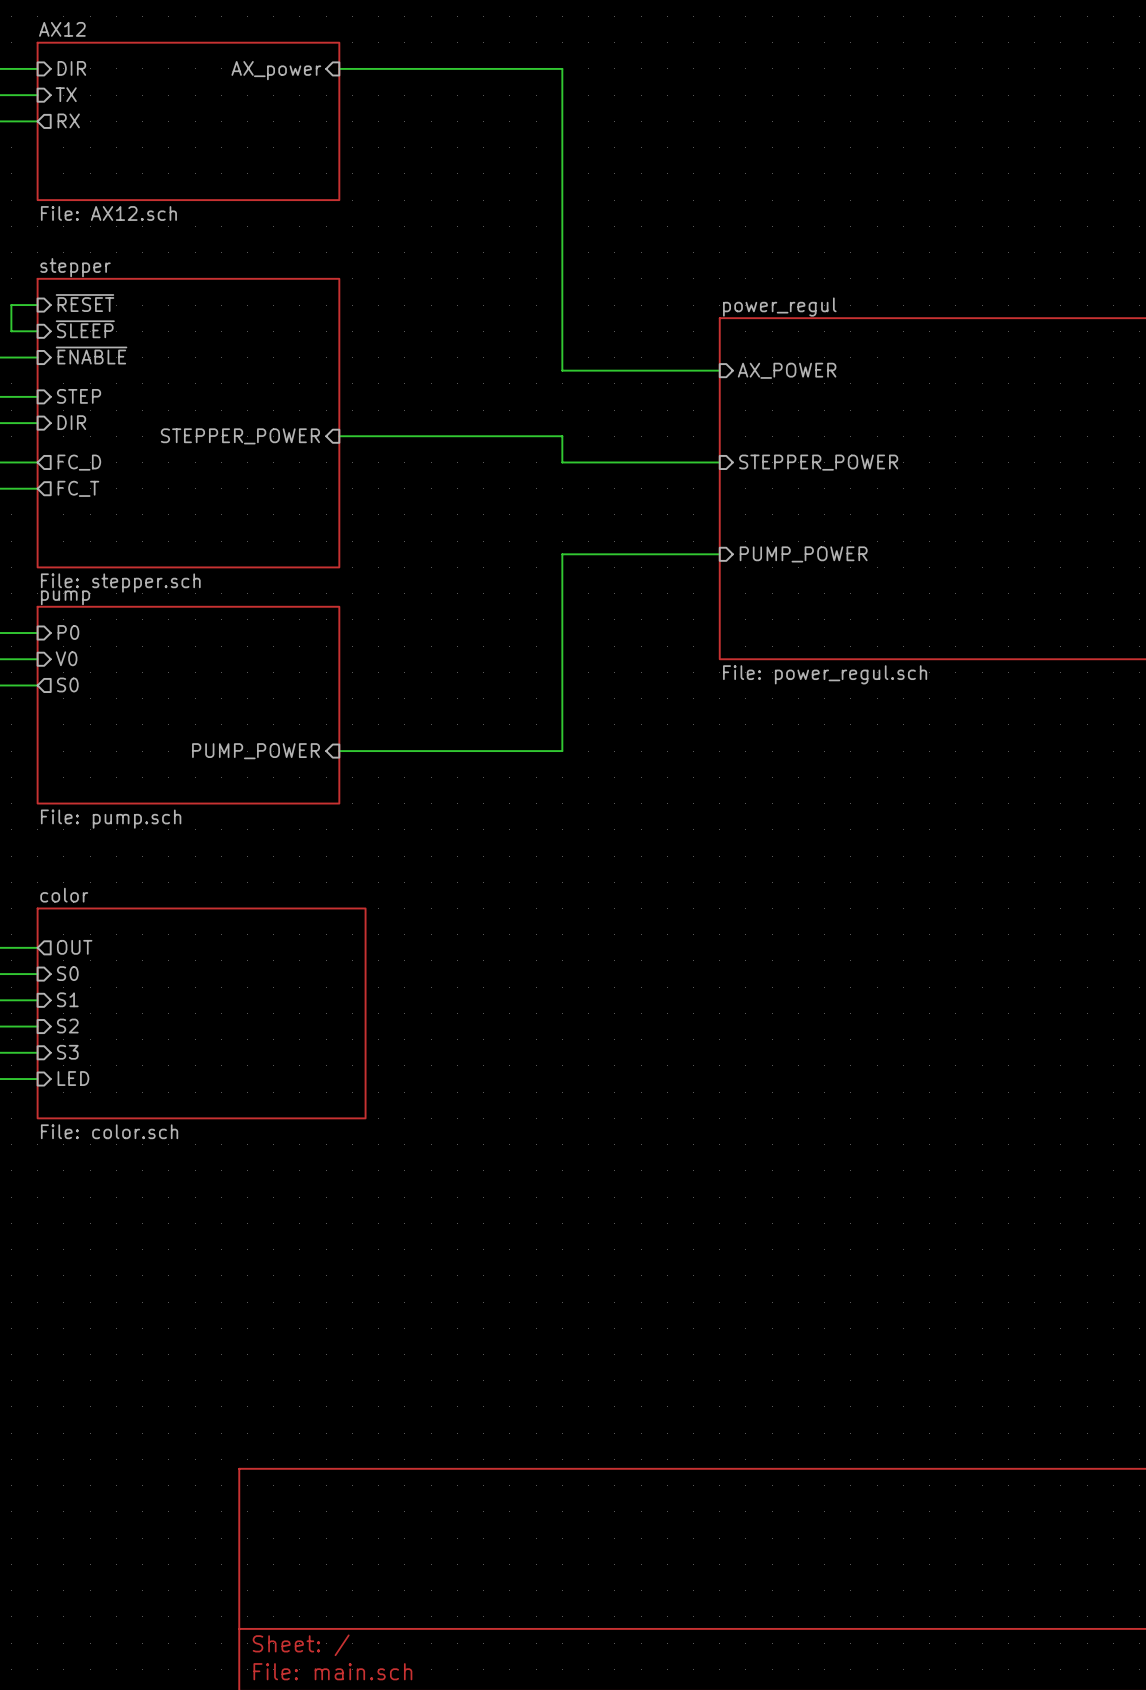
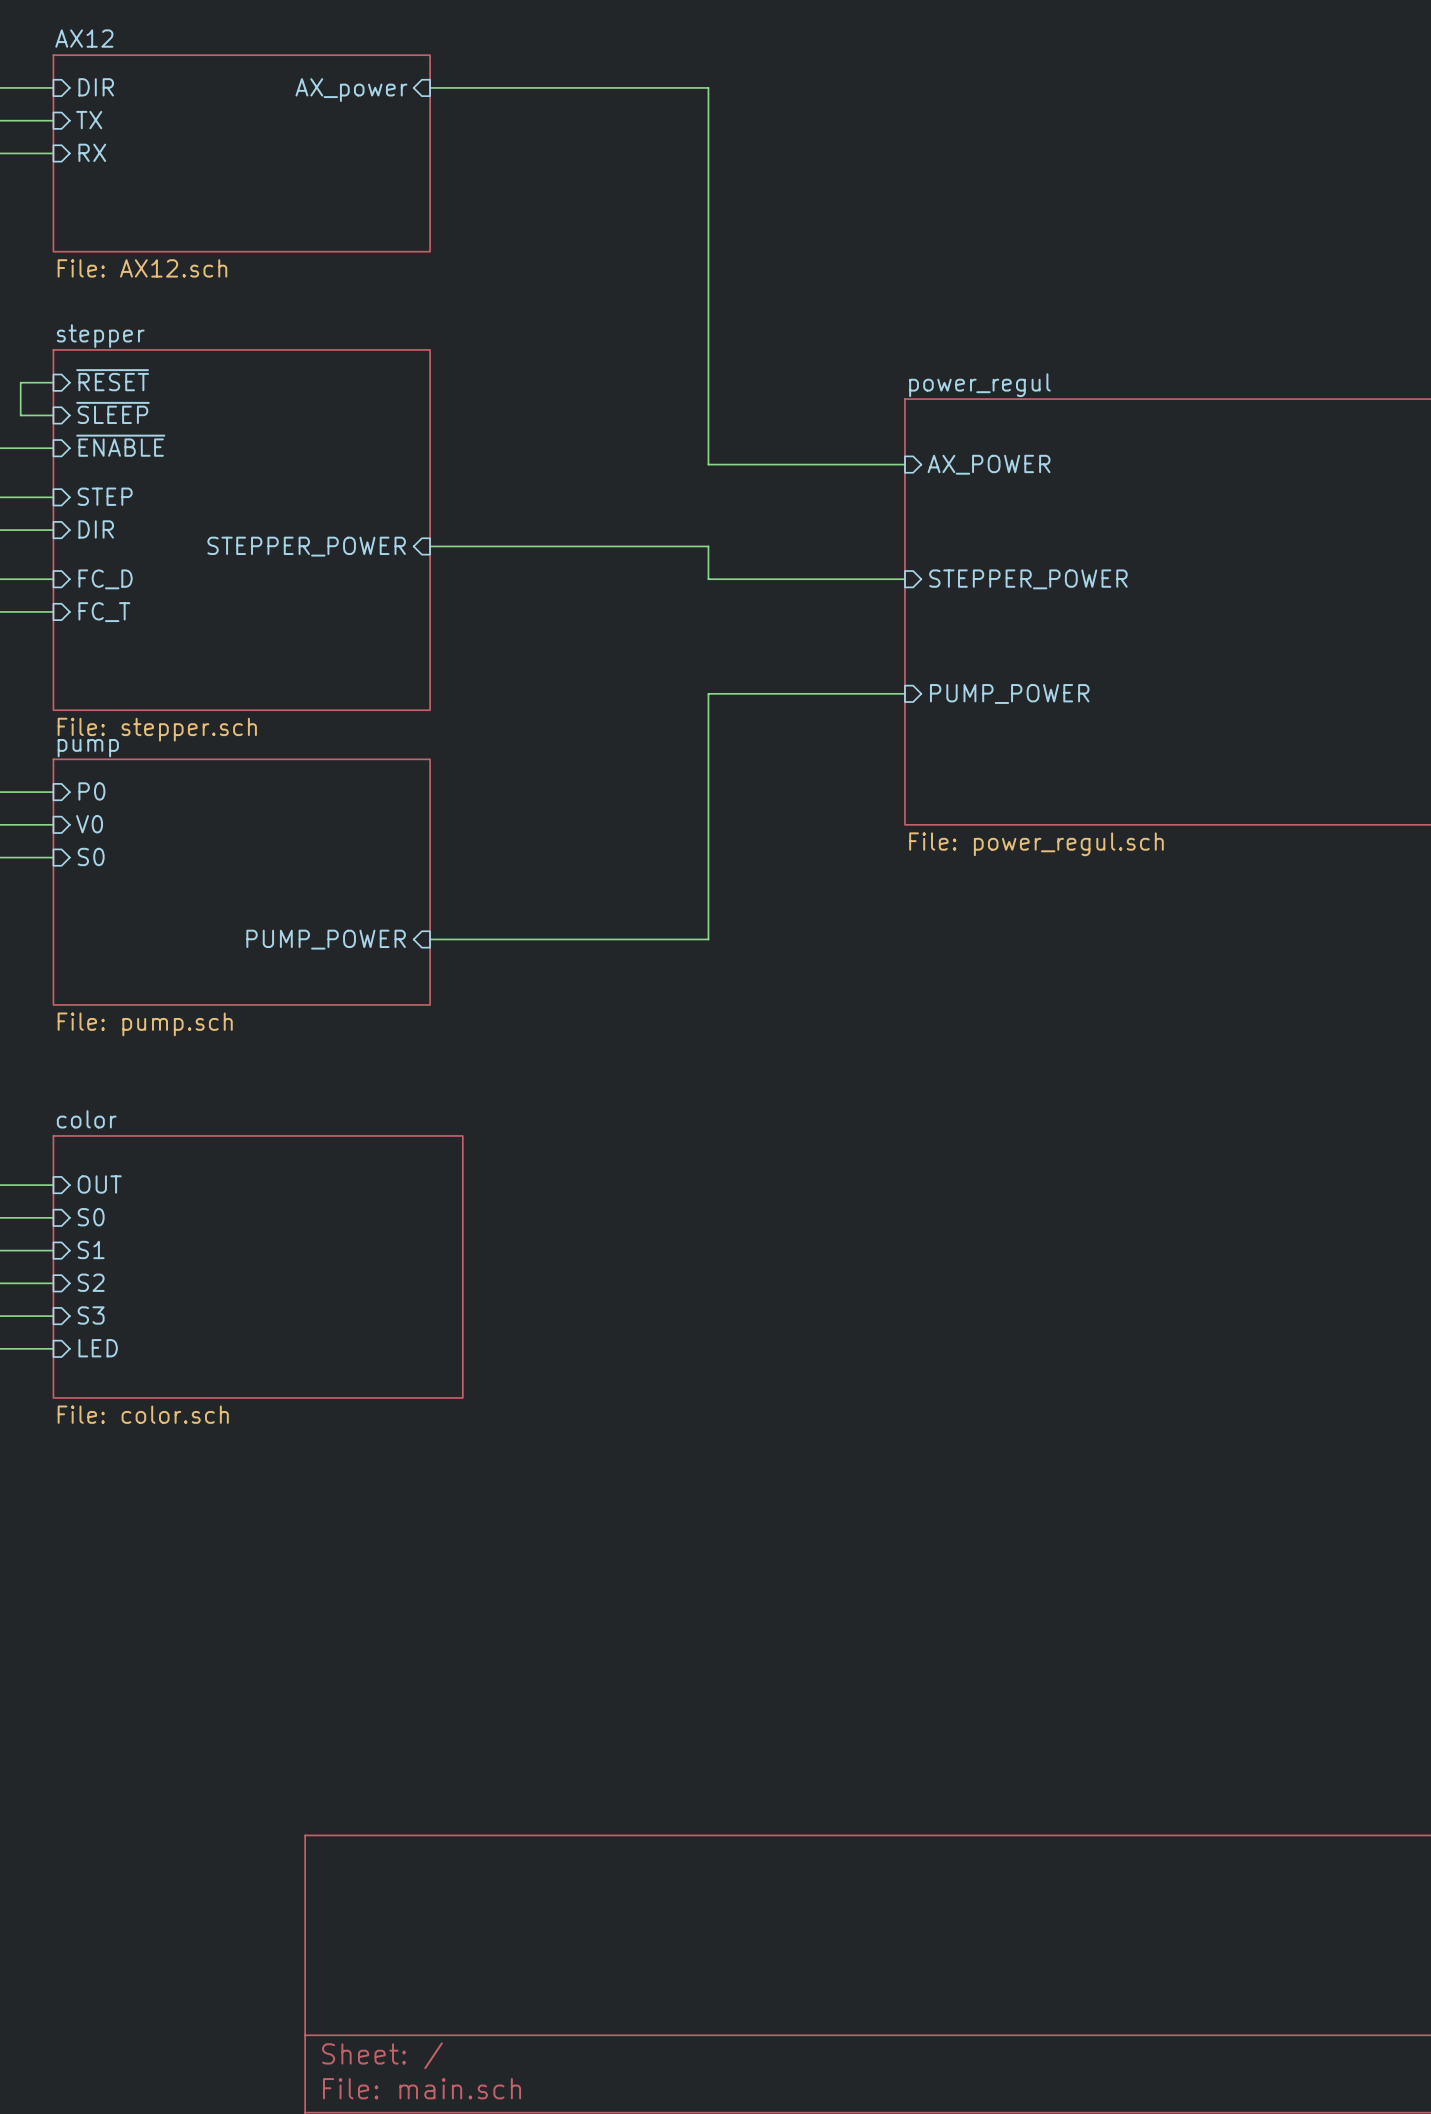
sheet pin shape: output (68, 120) -> input (92, 152)
sheet pin shape: output (79, 462) -> input (105, 579)
sheet pin shape: output (78, 488) -> input (104, 612)
sheet pin shape: output (67, 684) -> input (91, 856)
sheet pin shape: output (74, 947) -> input (99, 1184)

